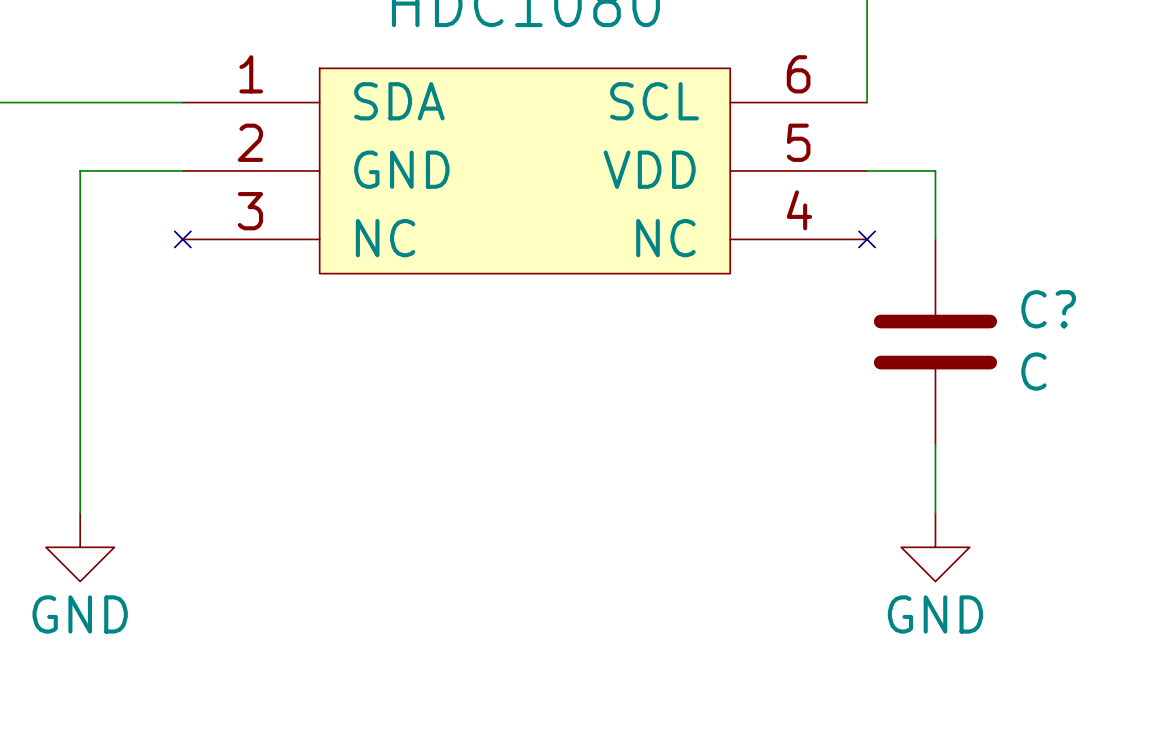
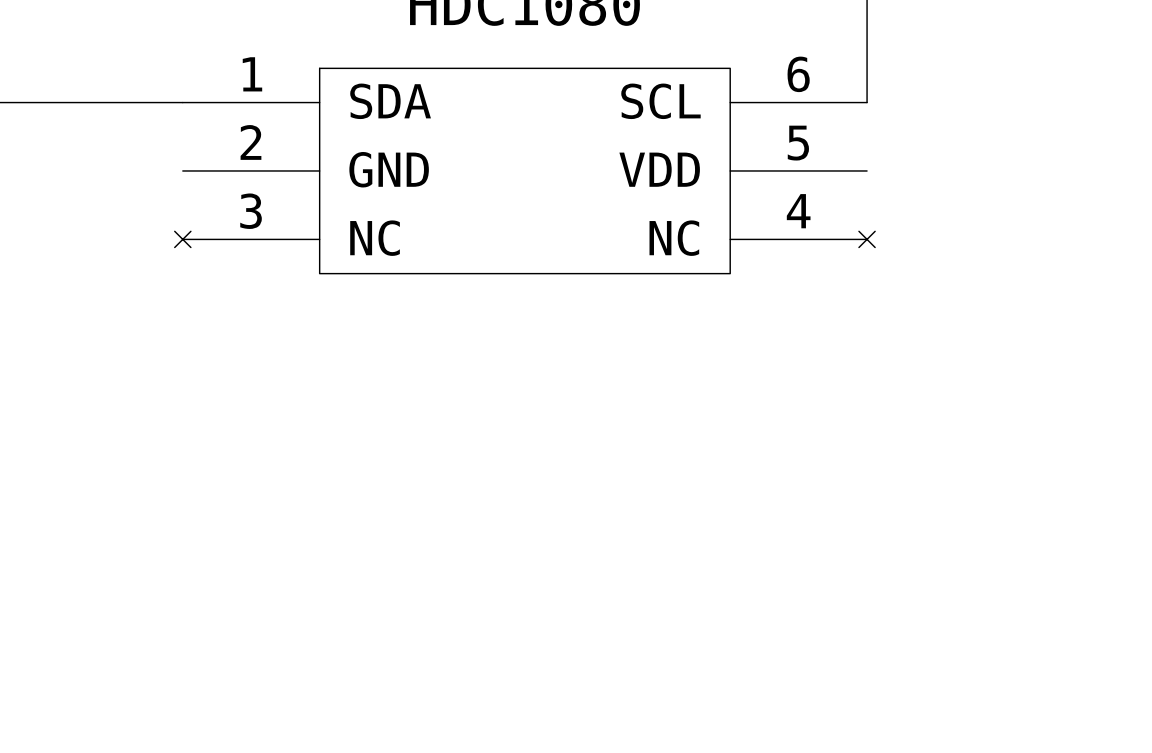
wire: (182, 170) (80, 170) (80, 513) -> none
wire: (867, 170) (935, 170) (935, 239) -> none
C?: C (935, 342) -> none
wire: (935, 444) (935, 513) -> none
power symbol: GND (80, 547) -> none
power symbol: GND (935, 547) -> none

